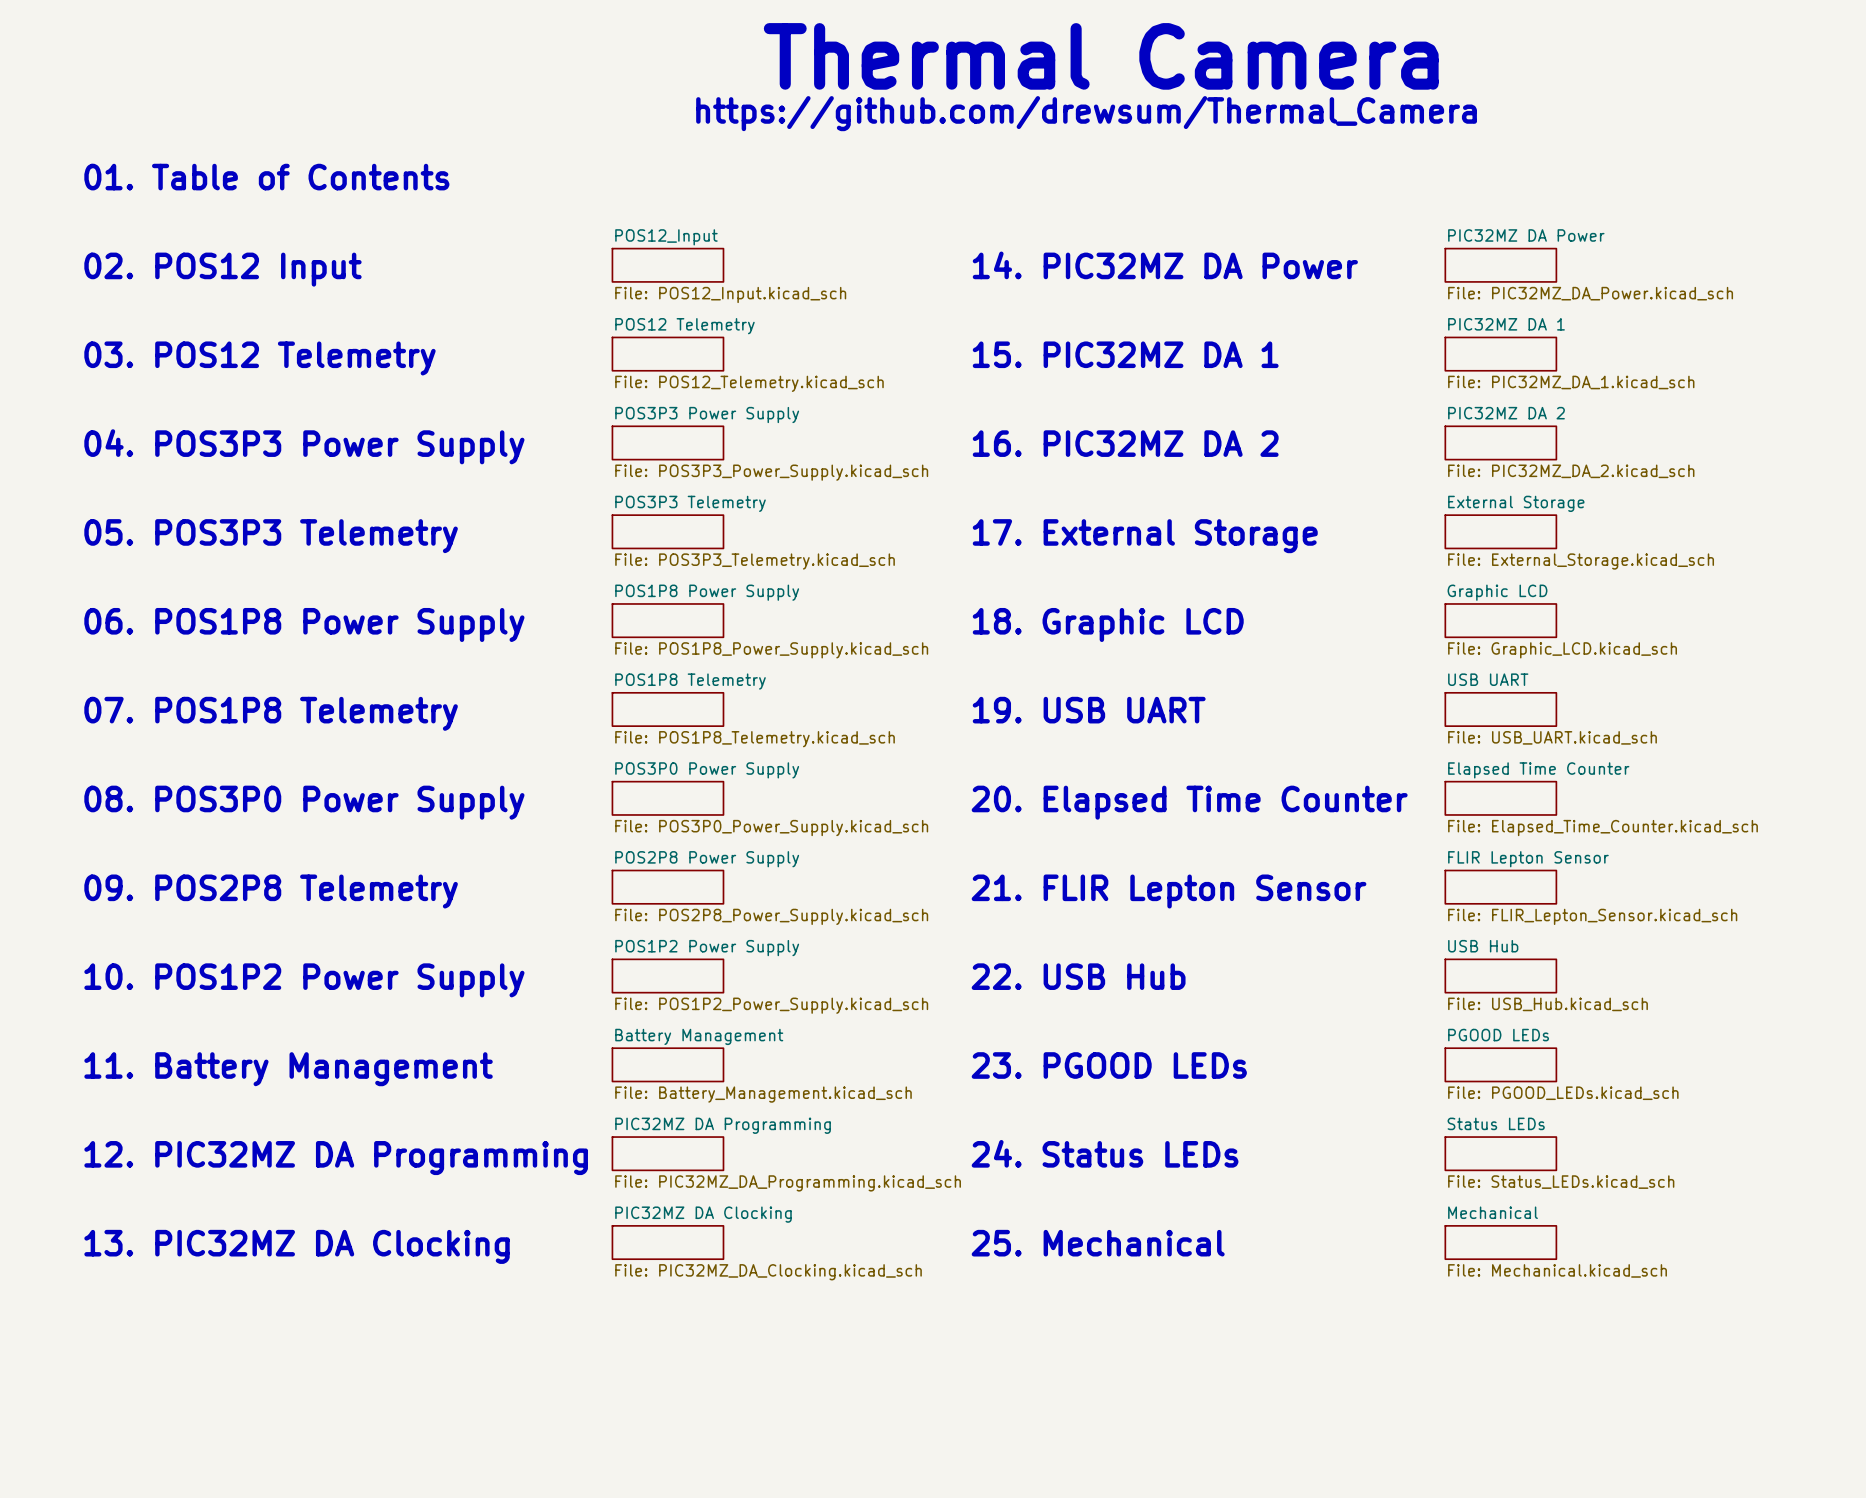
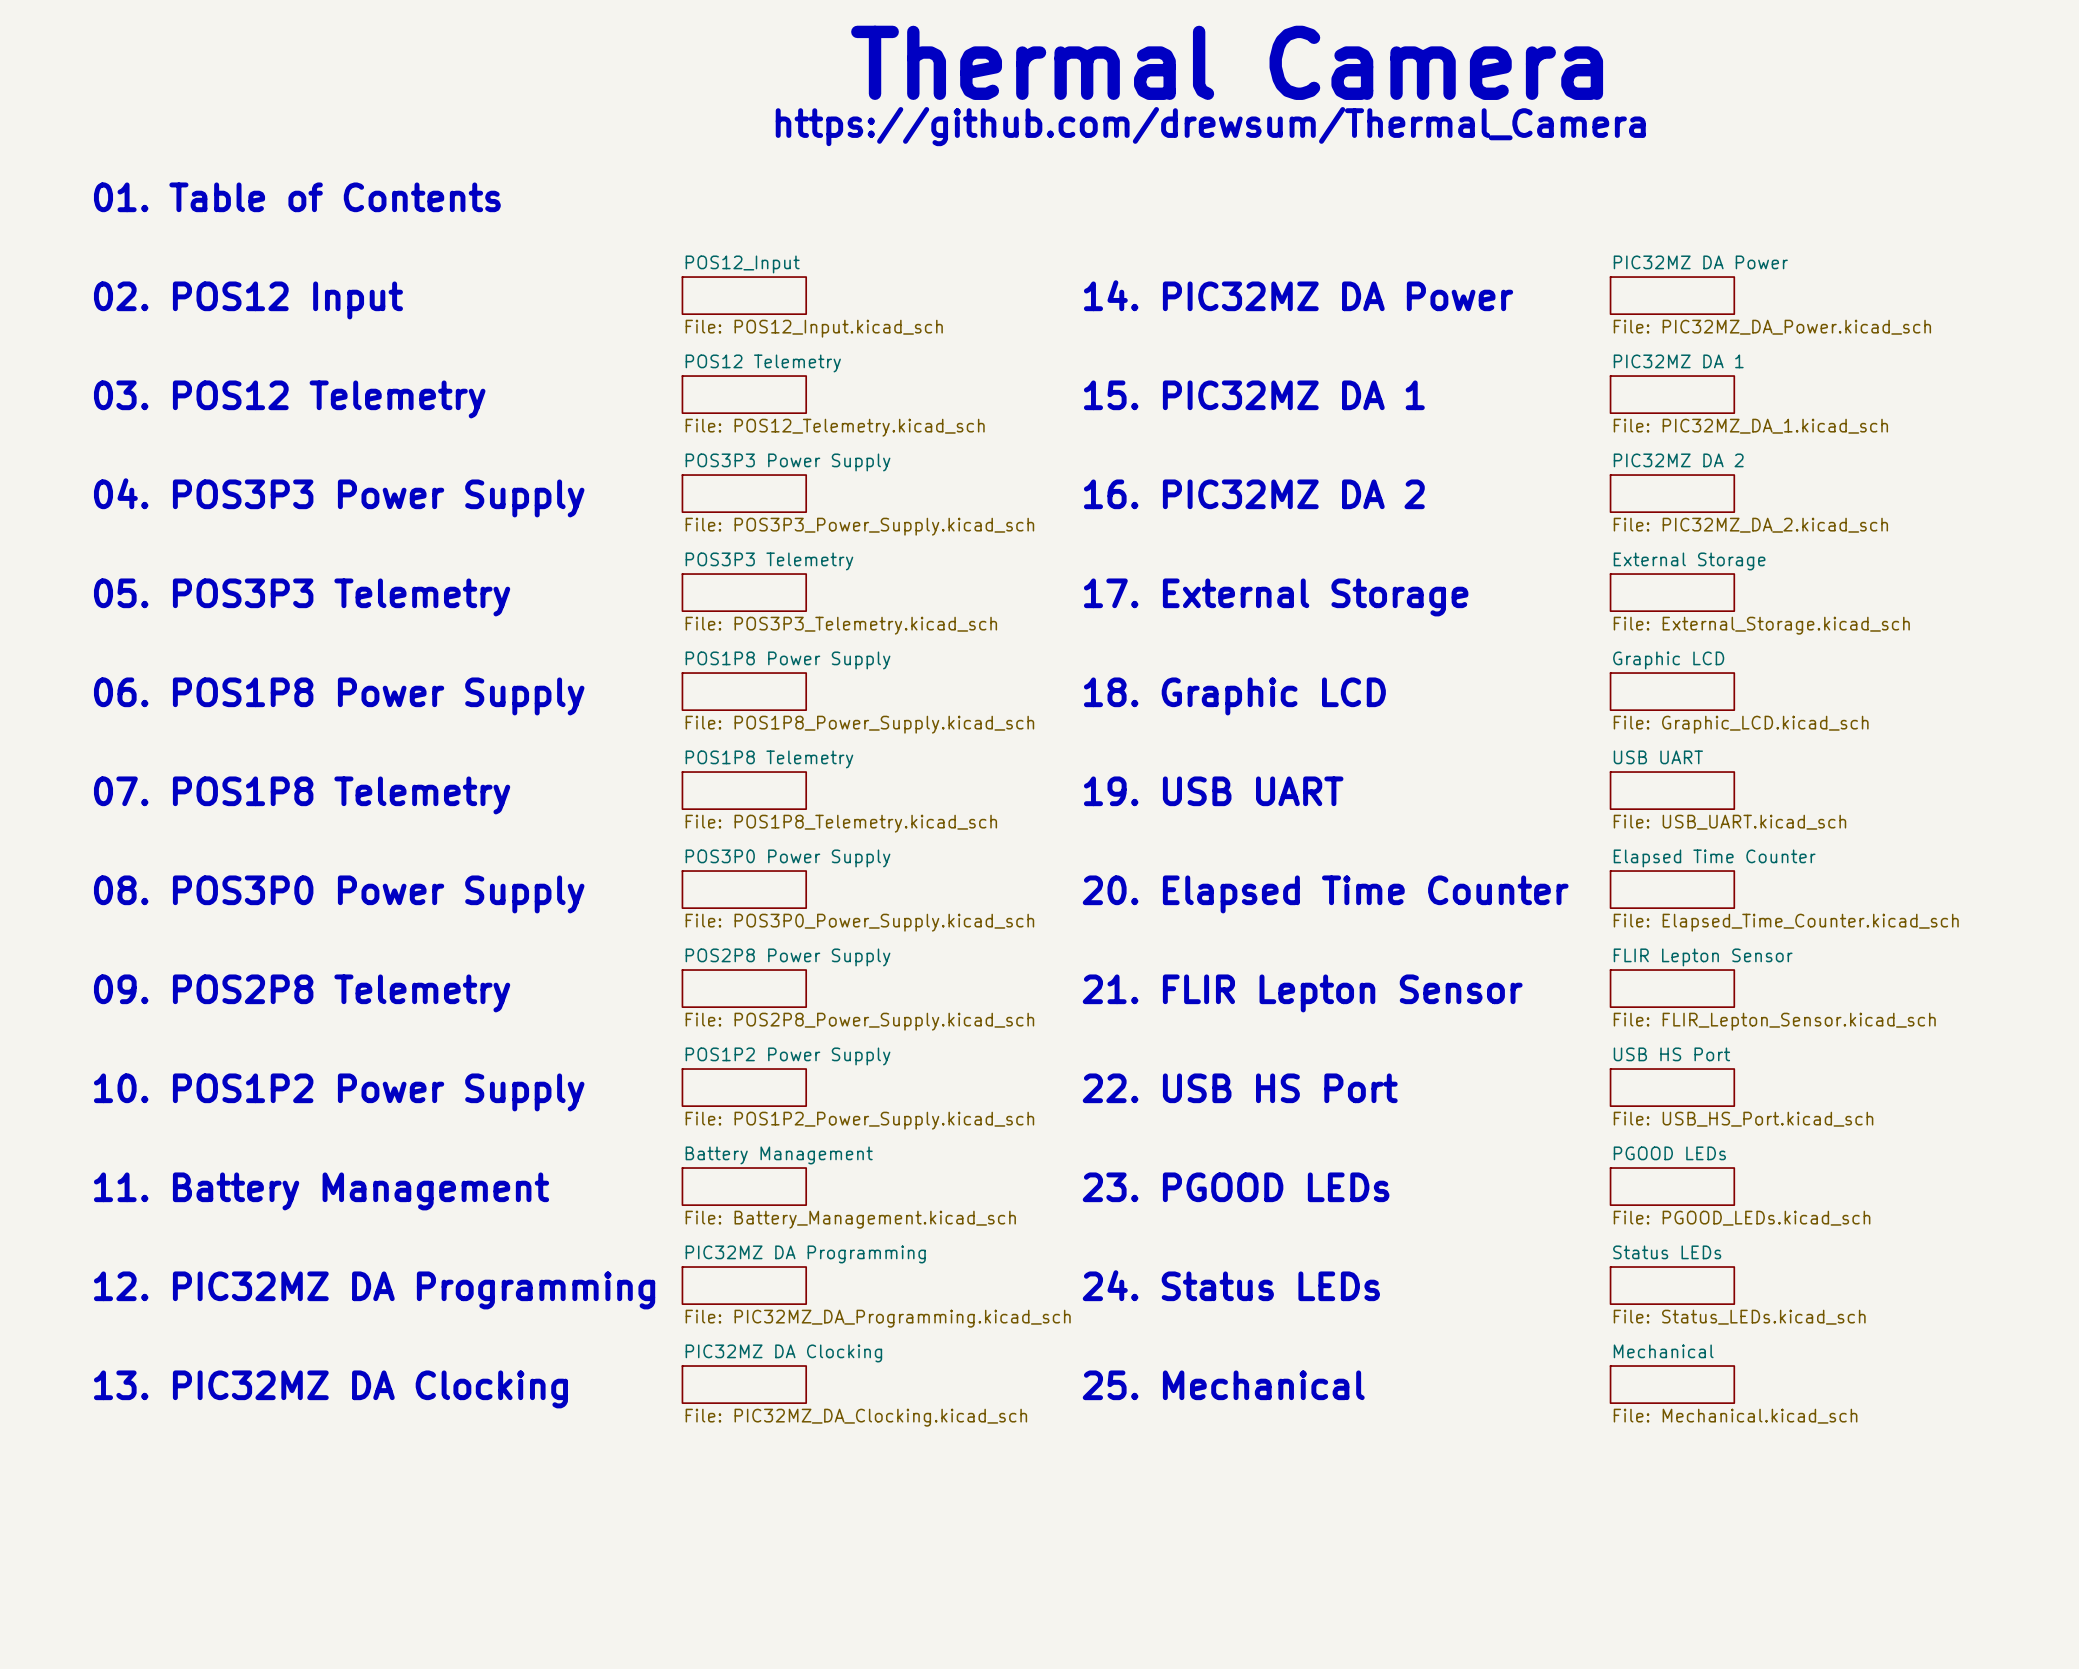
sheet USB Hub name: USB Hub (1483, 946) -> USB HS Port (1671, 1054)
text: 22. USB Hub (1078, 976) -> 22. USB HS Port (1240, 1088)
sheet USB Hub value: File: USB_Hub.kicad_sch (1548, 1004) -> File: USB_HS_Port.kicad_sch (1743, 1119)

